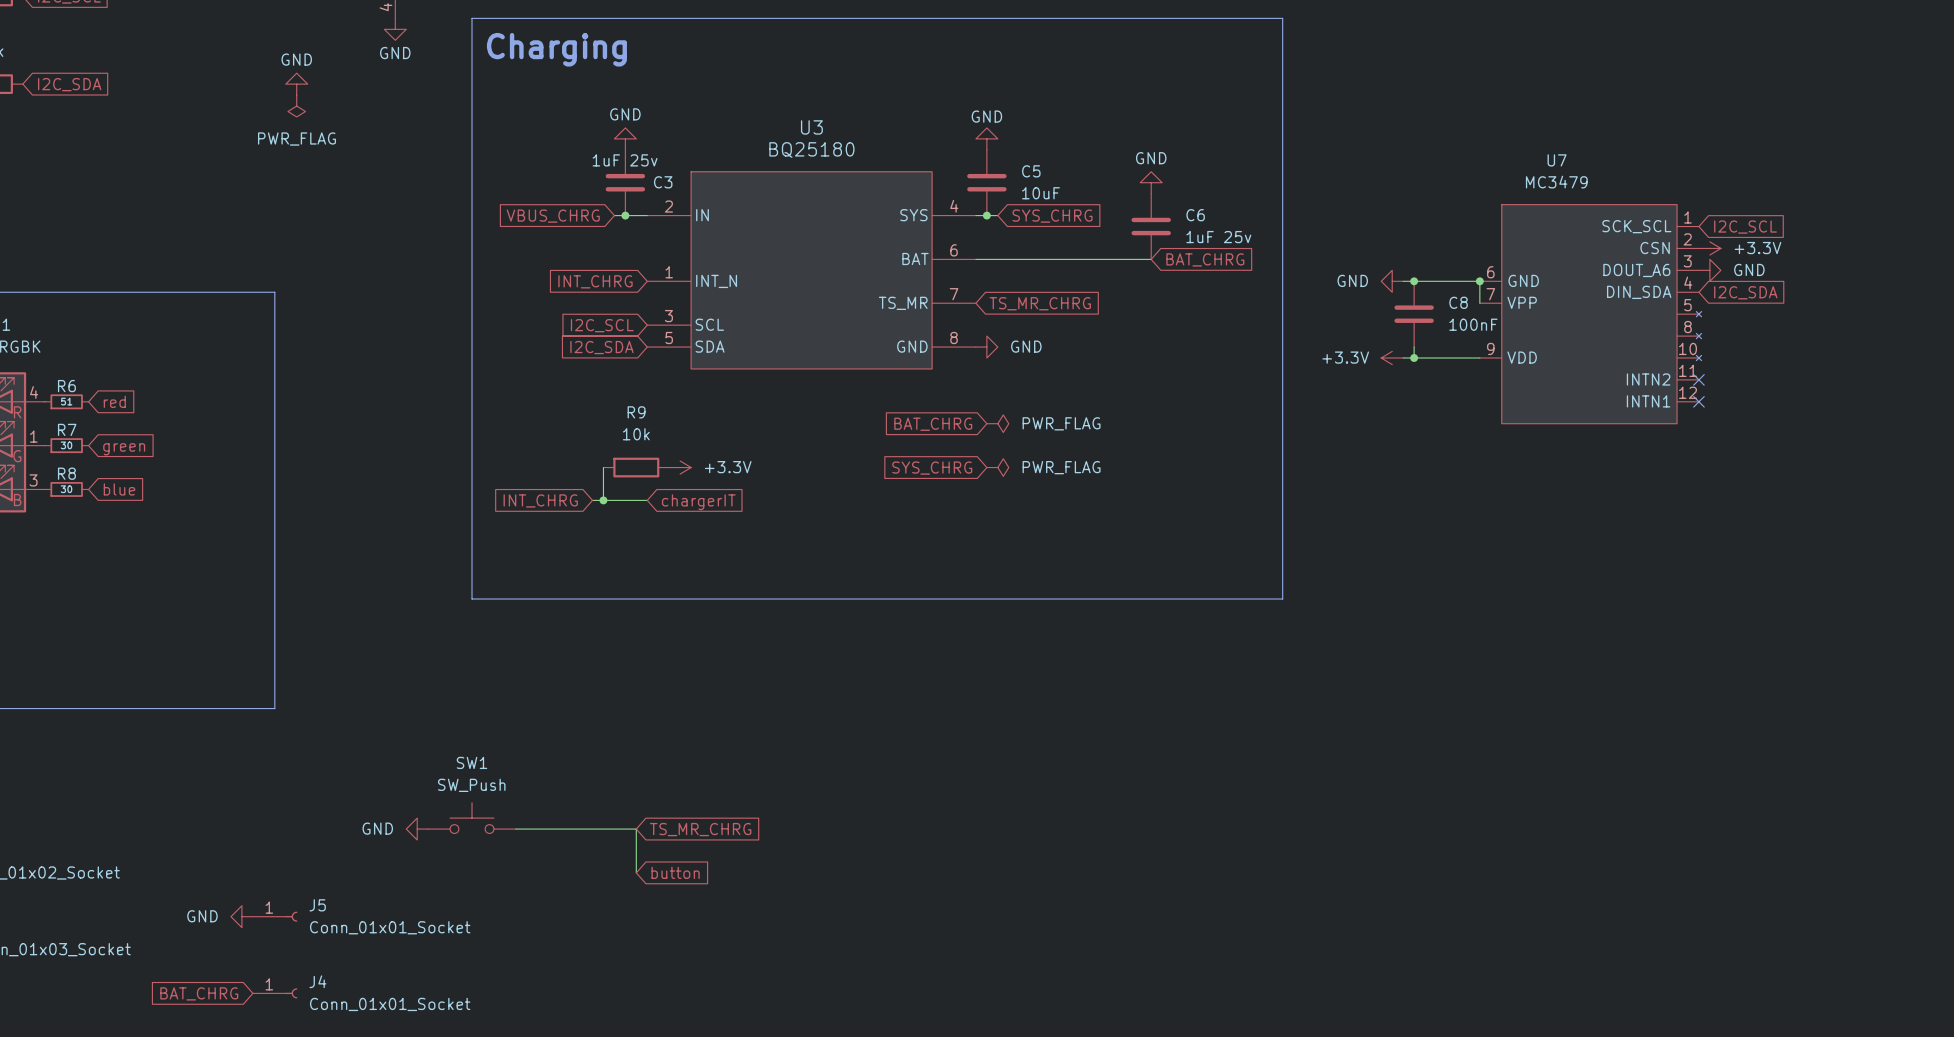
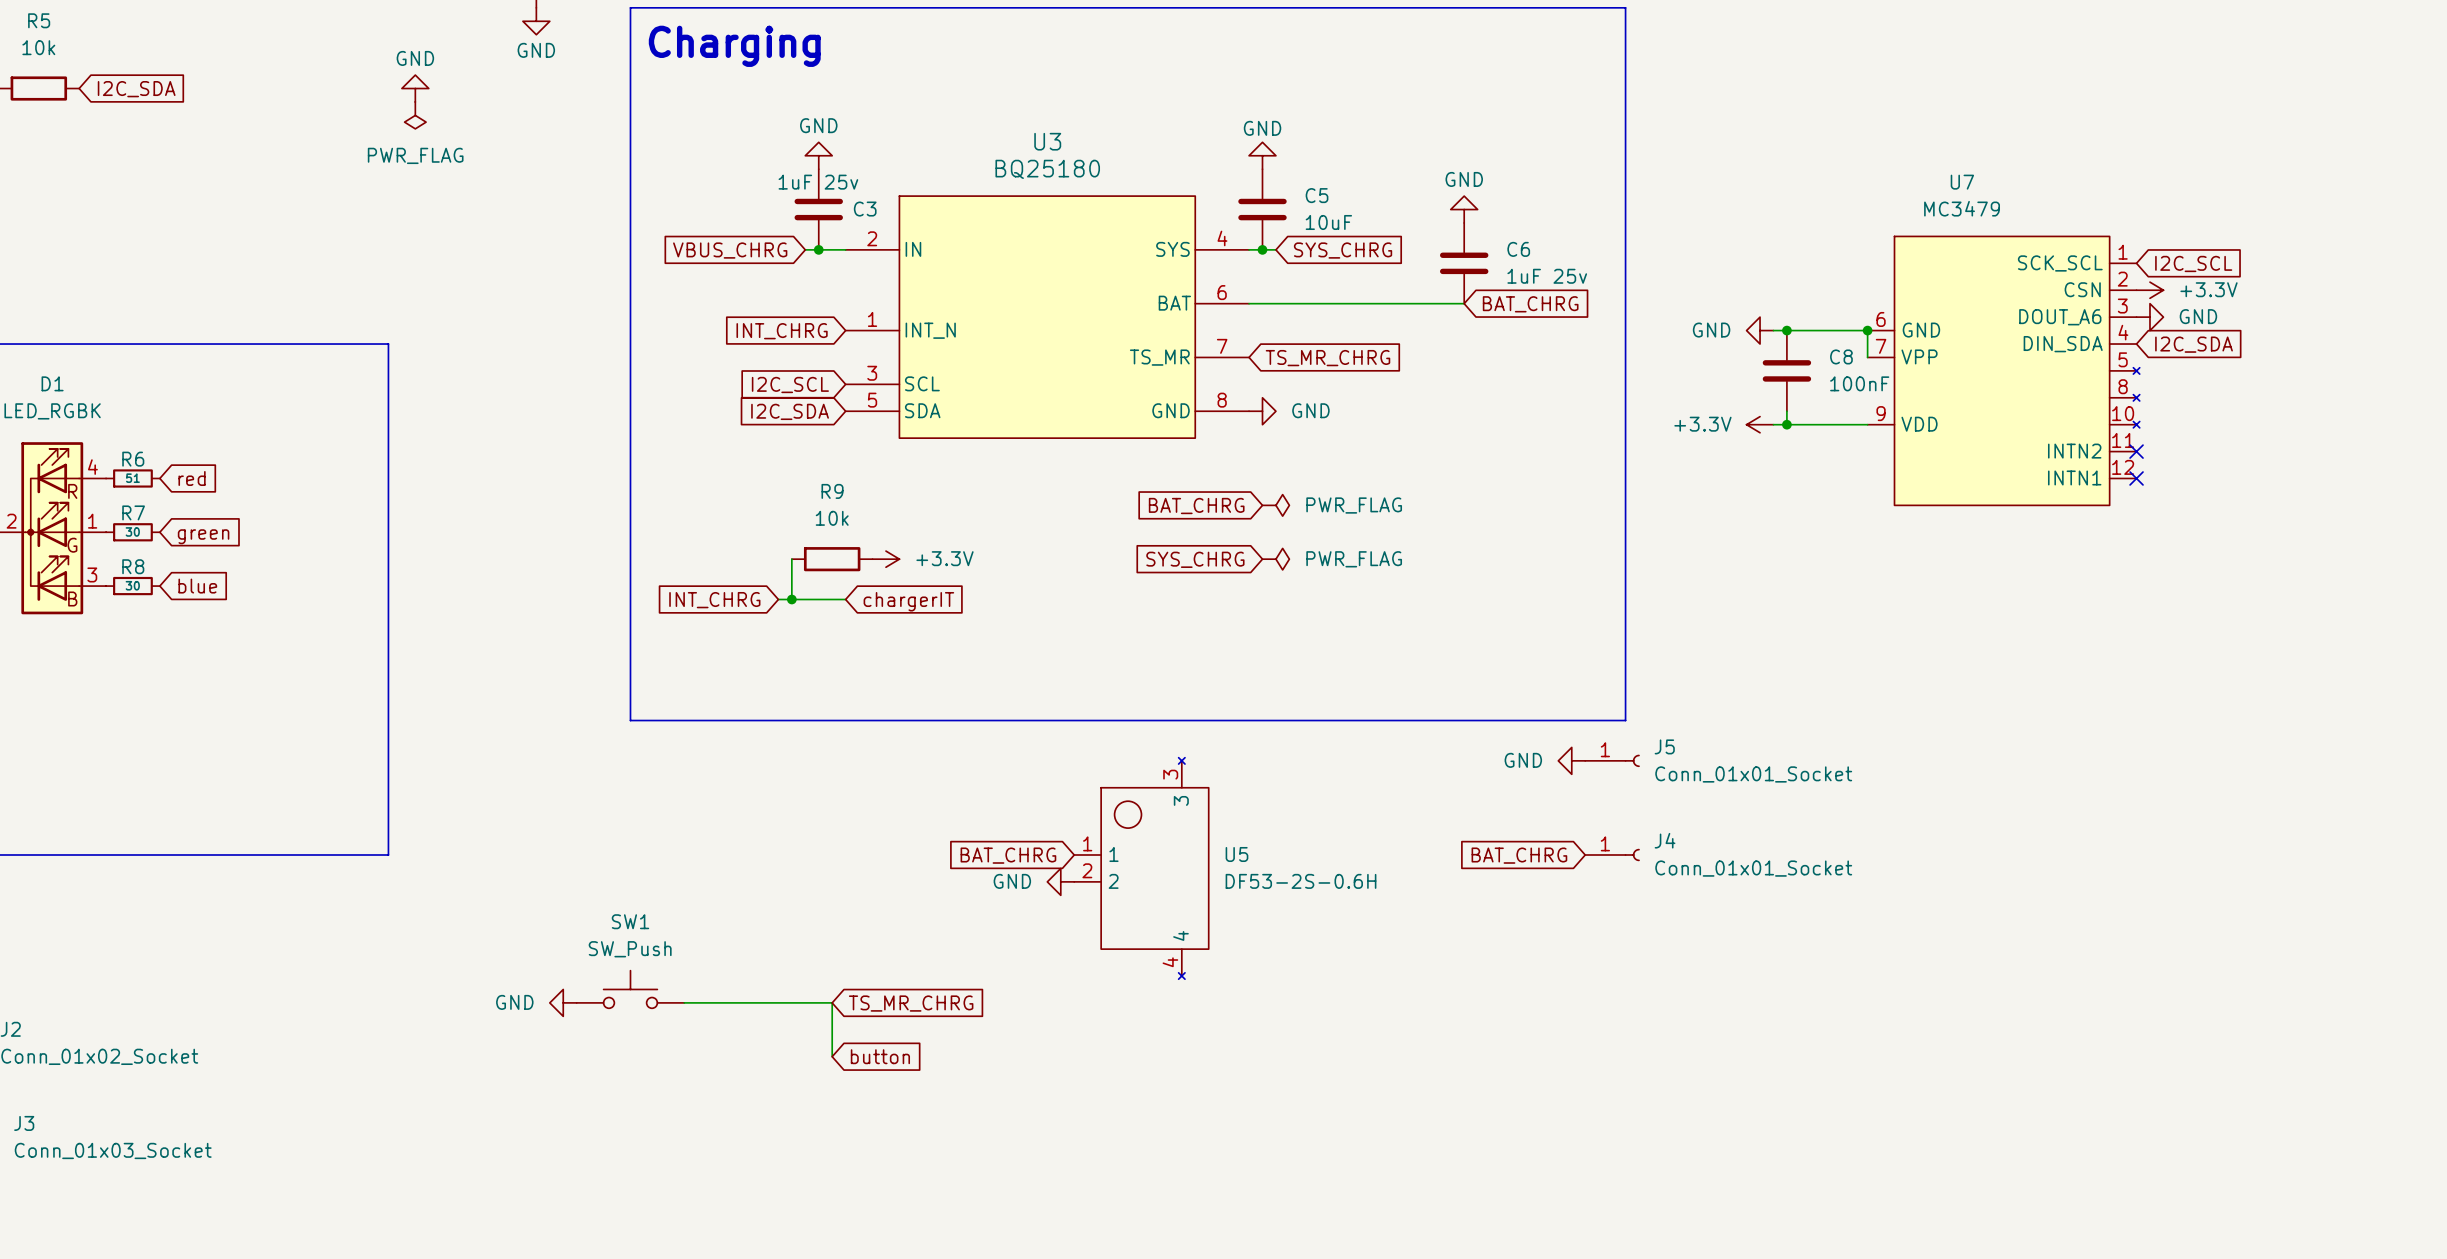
power symbol: none -> GND (1571, 760)
global label: none -> BAT_CHRG (1008, 855)
global label: none -> BAT_CHRG (1519, 855)
U5: none -> DF53-2S-0.6H (1141, 868)
power symbol: none -> GND (1060, 881)
power symbol: GND (241, 916) -> none
J5 position: (275, 916) -> (1612, 760)
global label: BAT_CHRG (199, 993) -> none
J4 position: (275, 993) -> (1612, 854)

